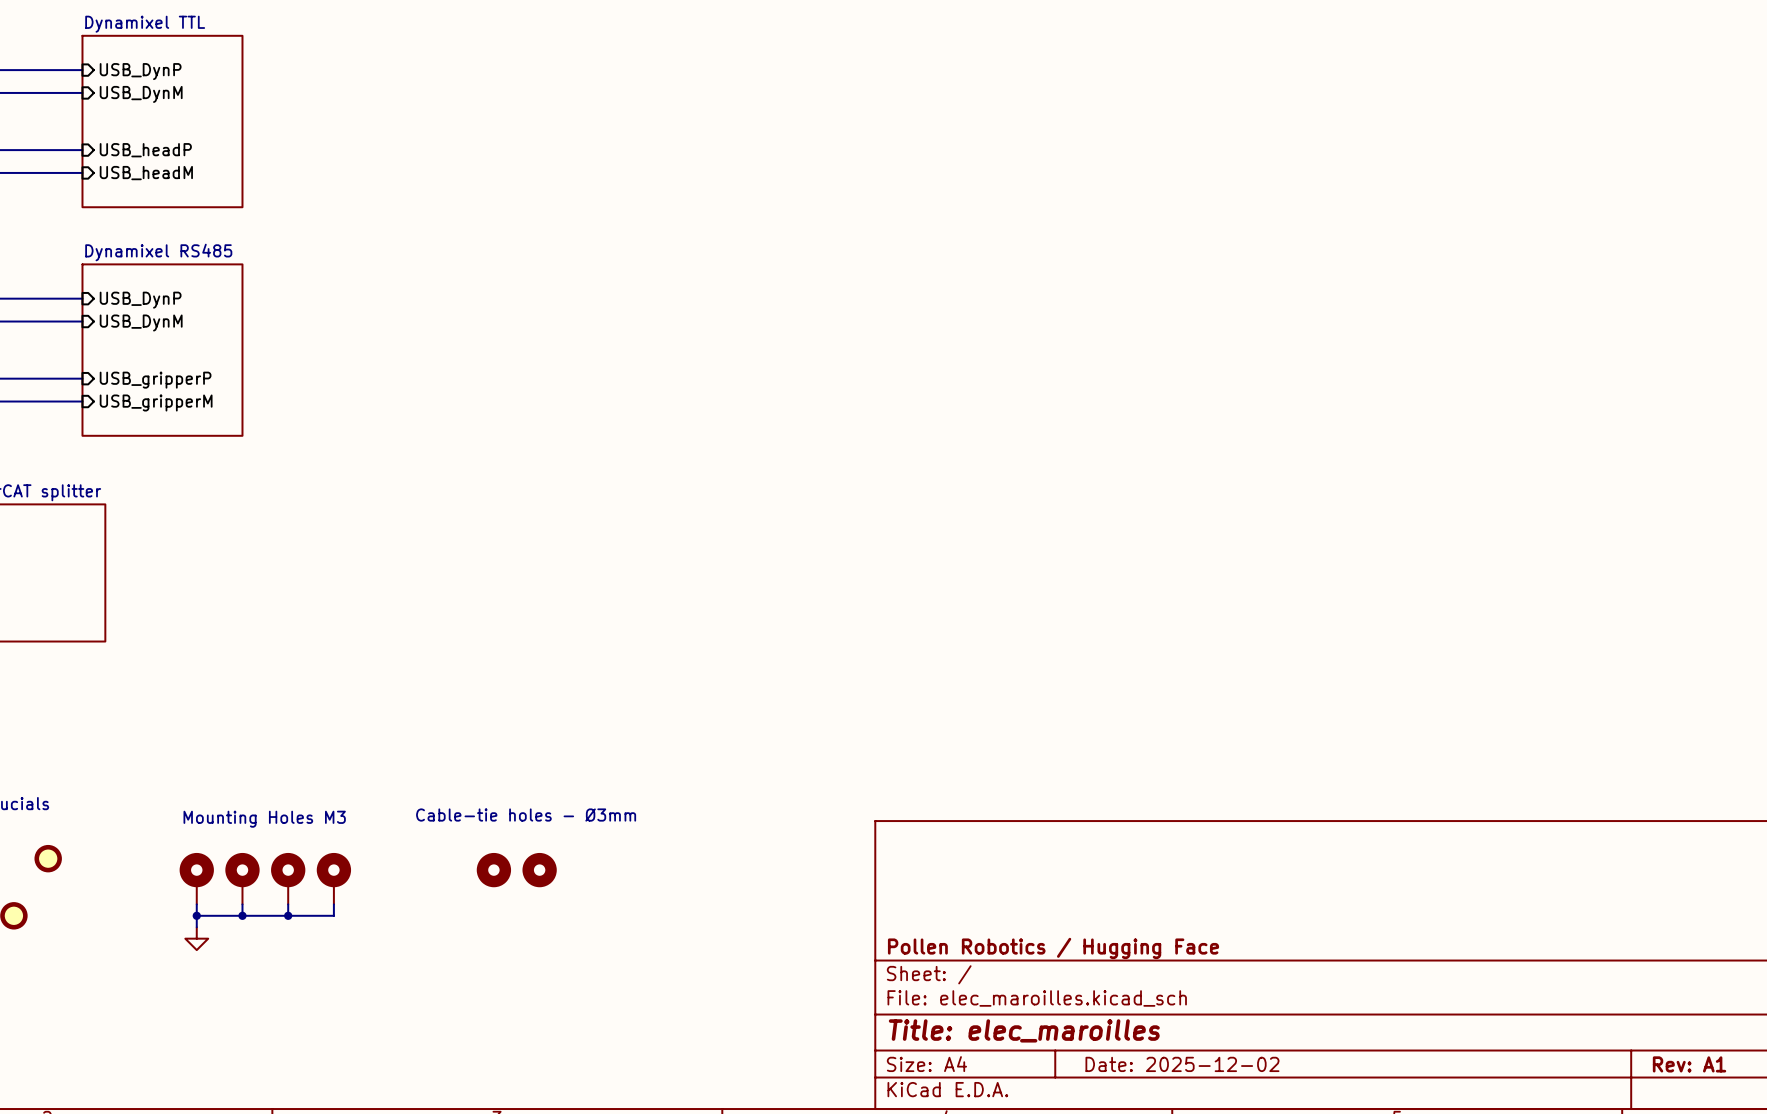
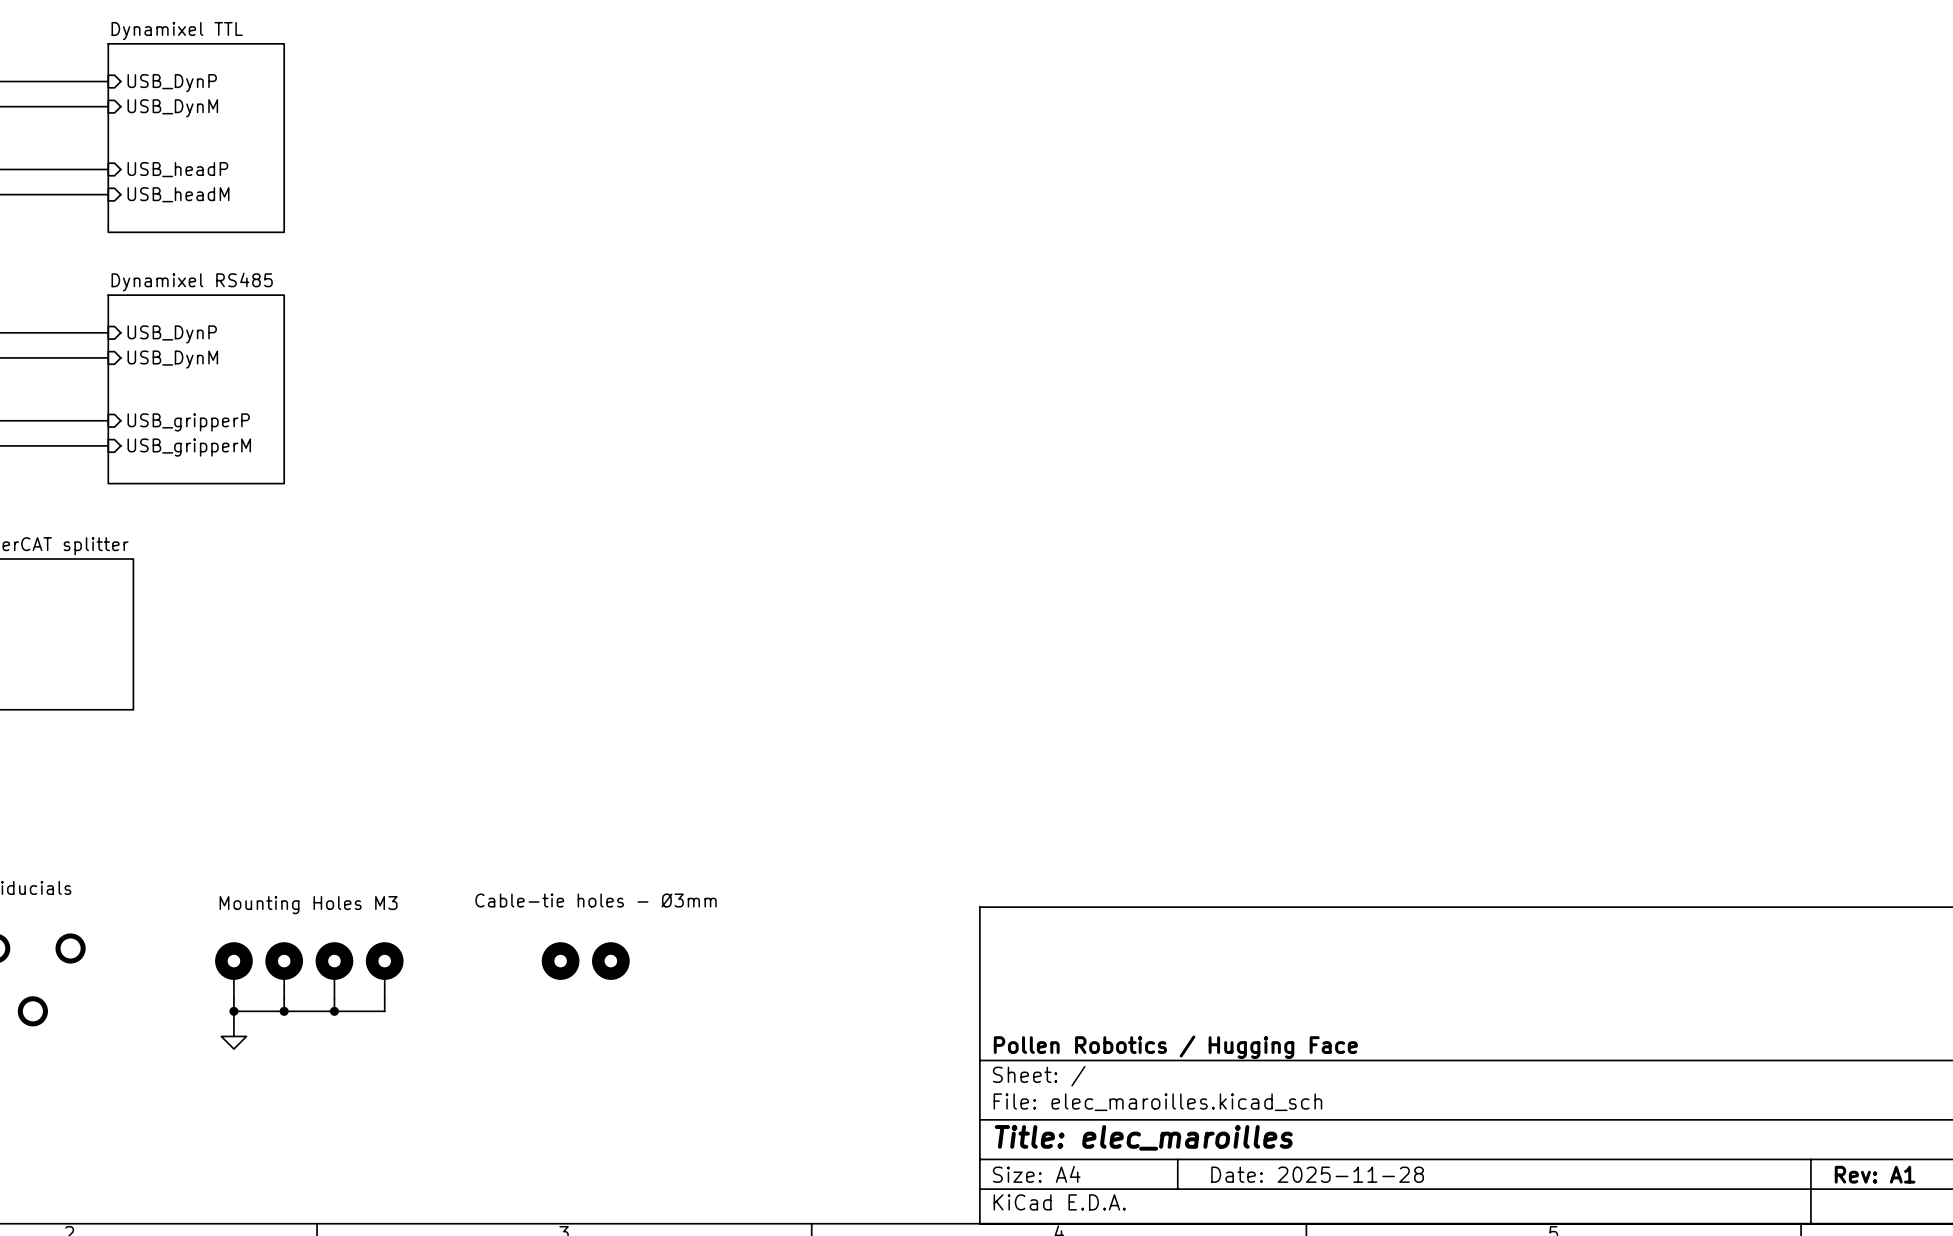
title block: Date: 2025-12-02 (1182, 1064) -> Date: 2025-11-28 (1317, 1174)

